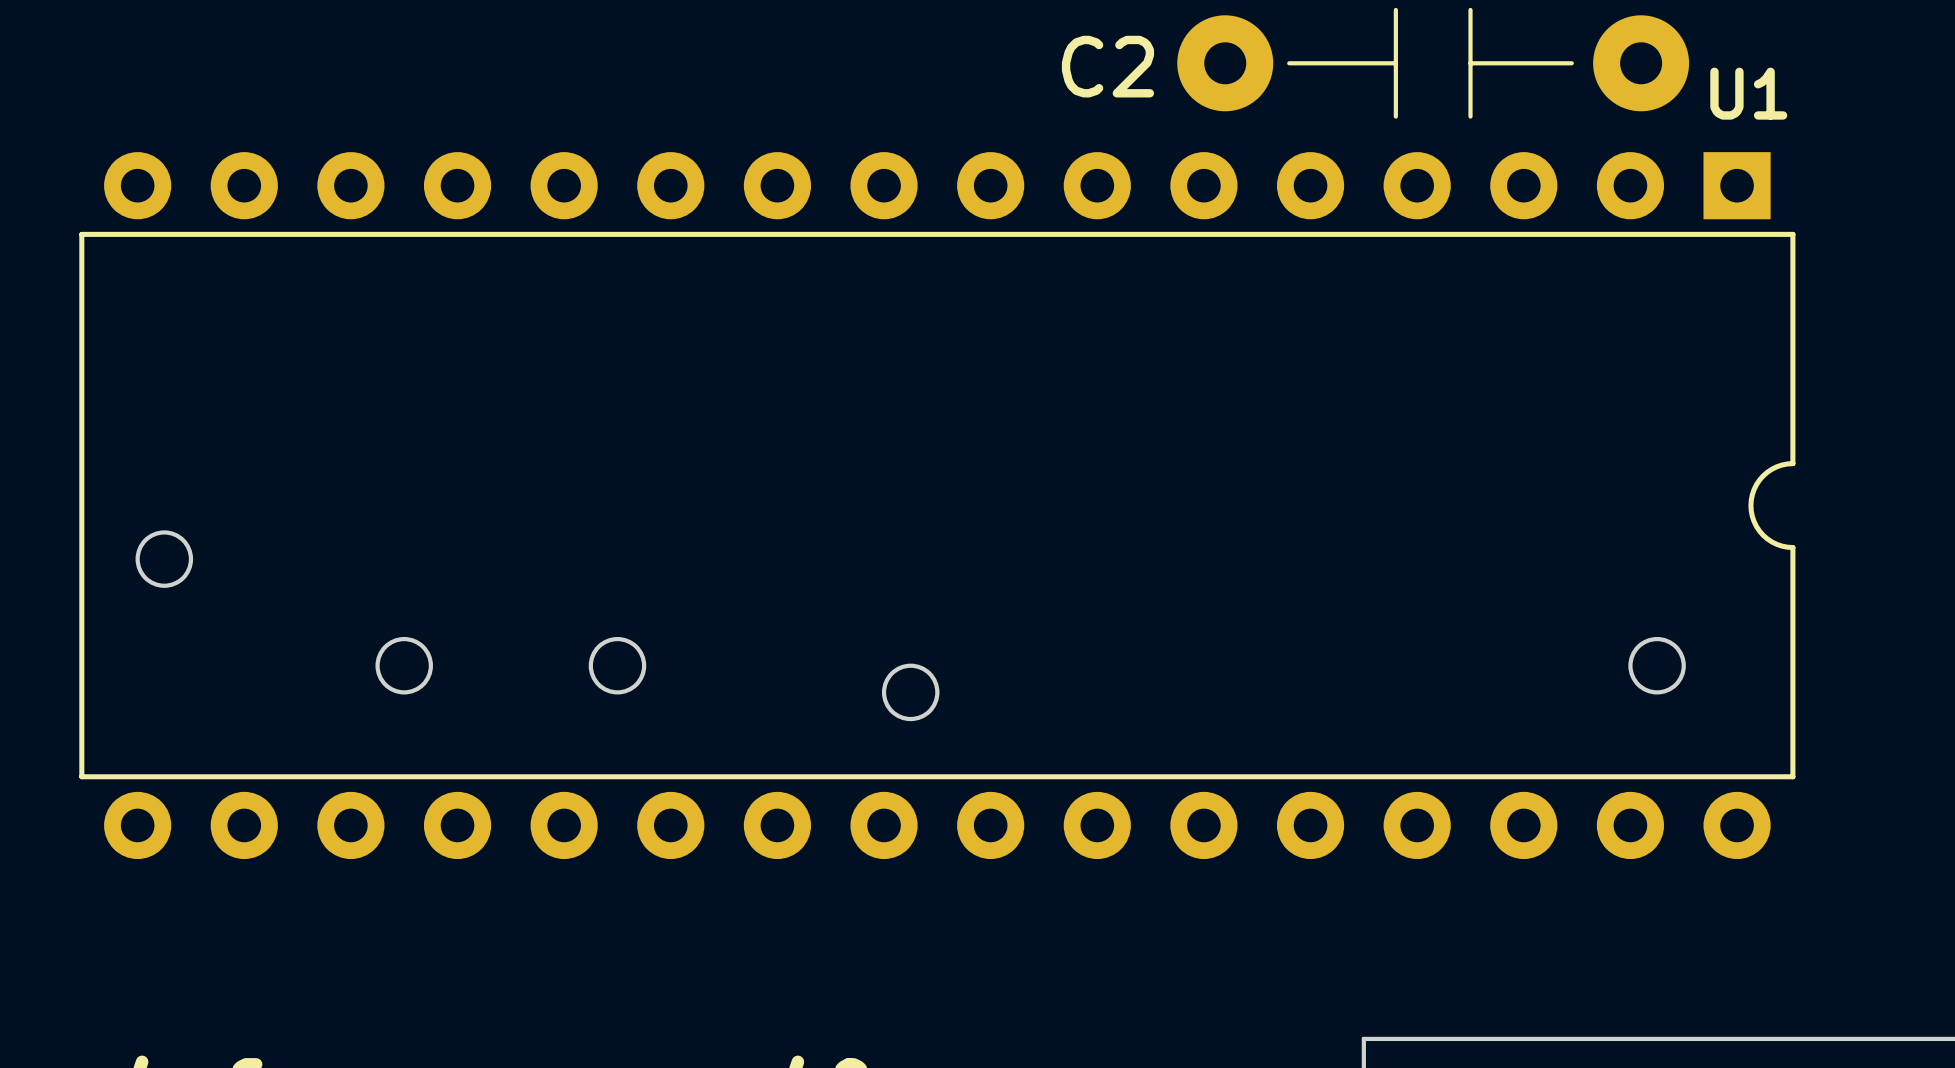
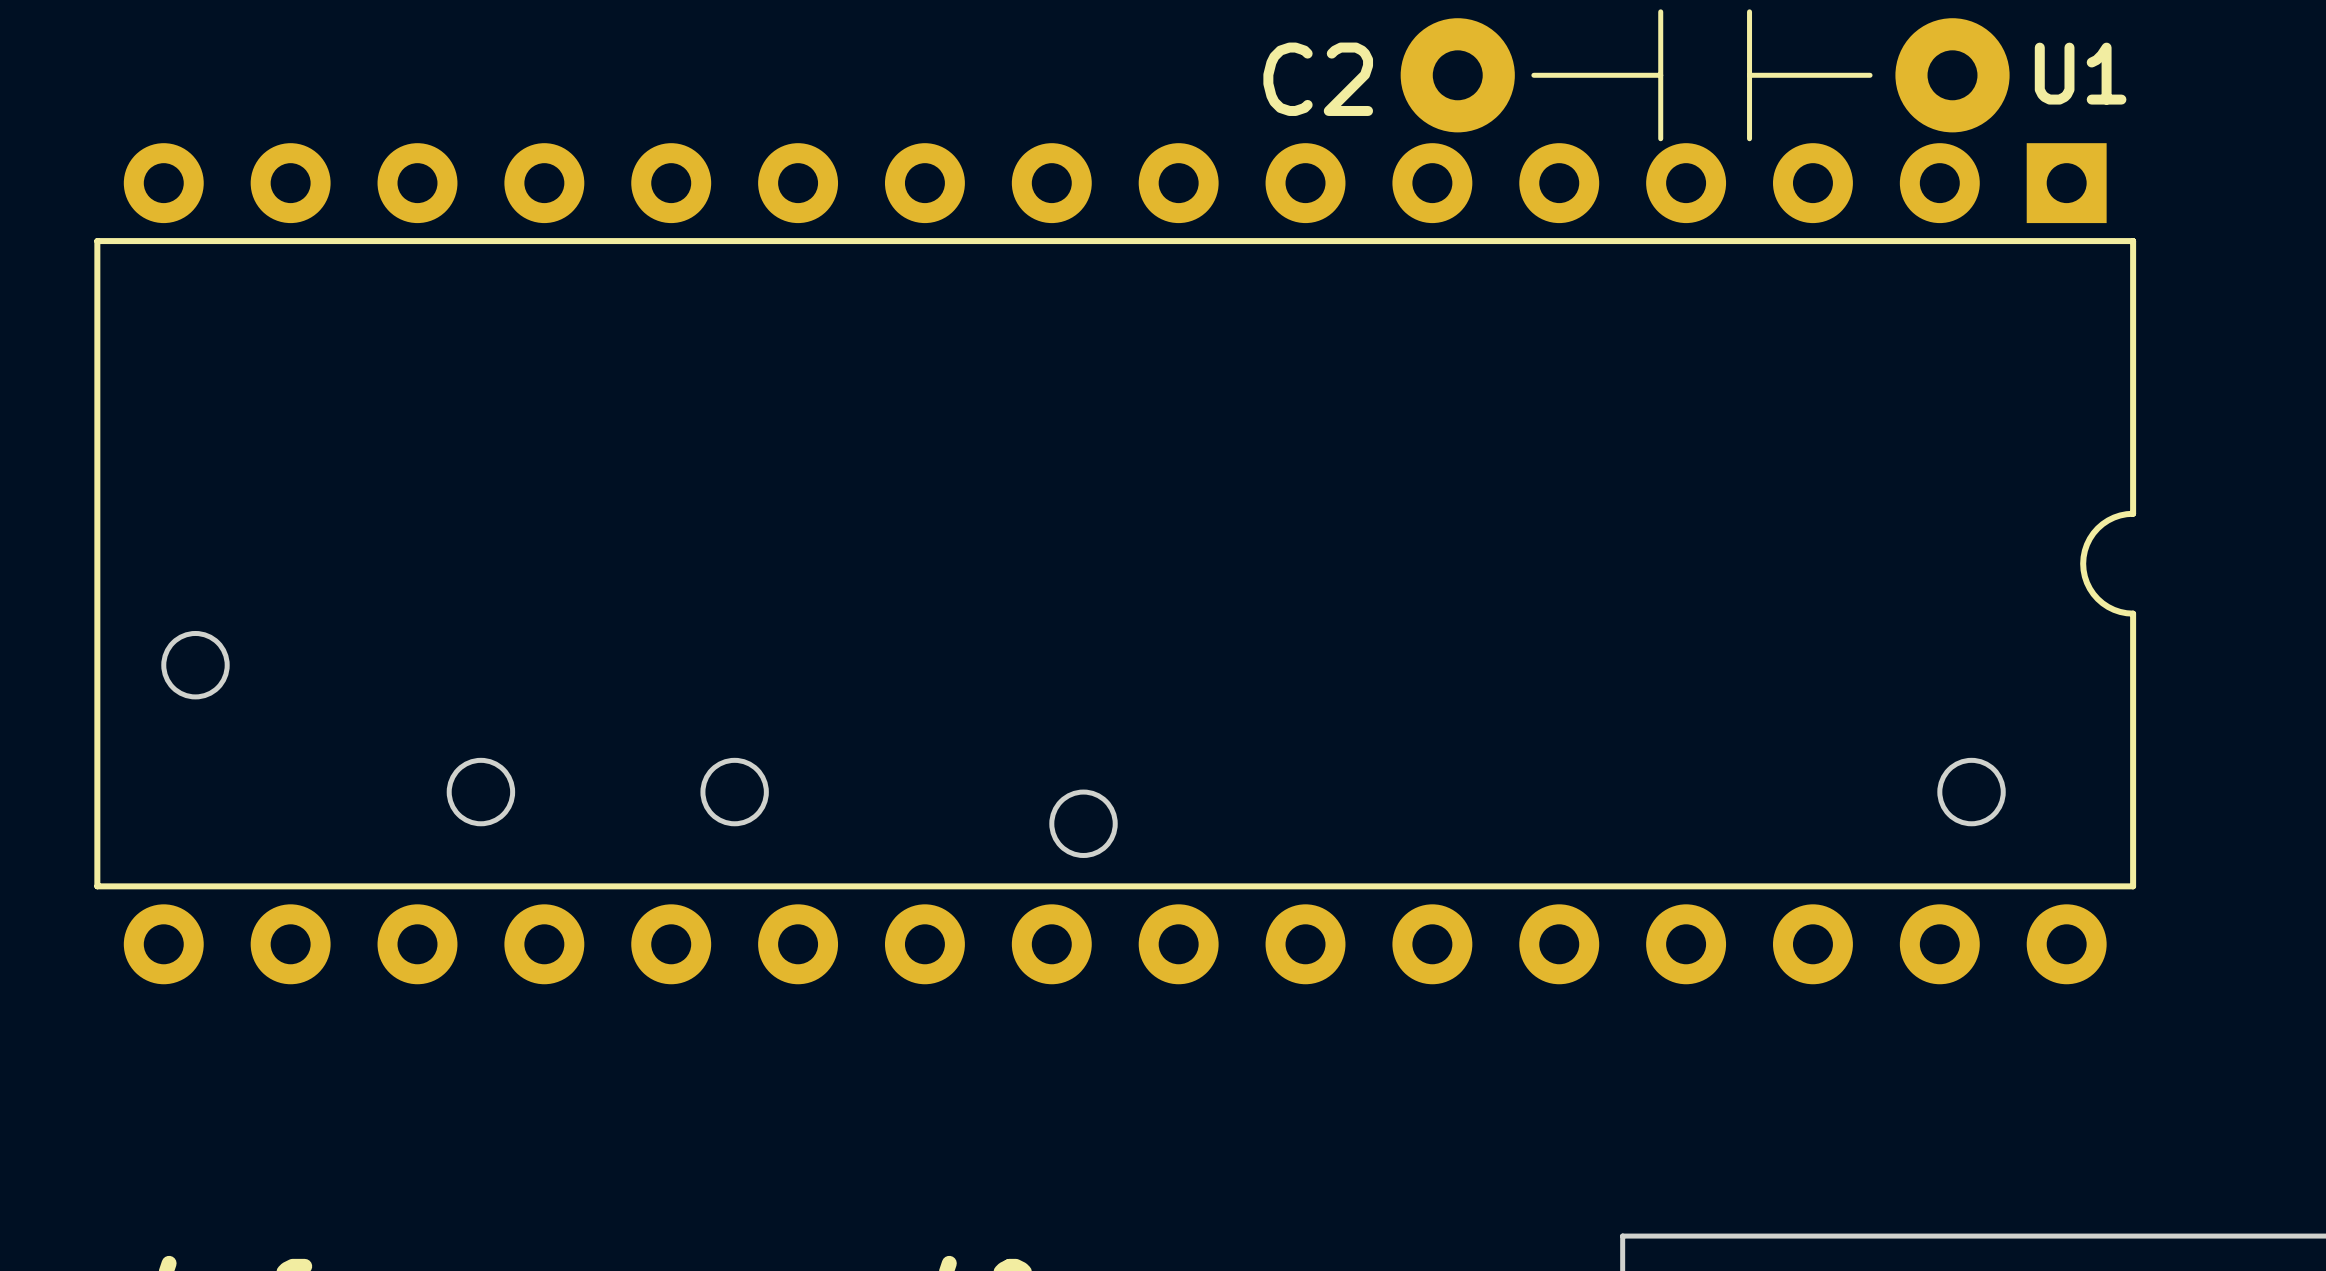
U1 position: (937, 505) -> (1115, 563)

